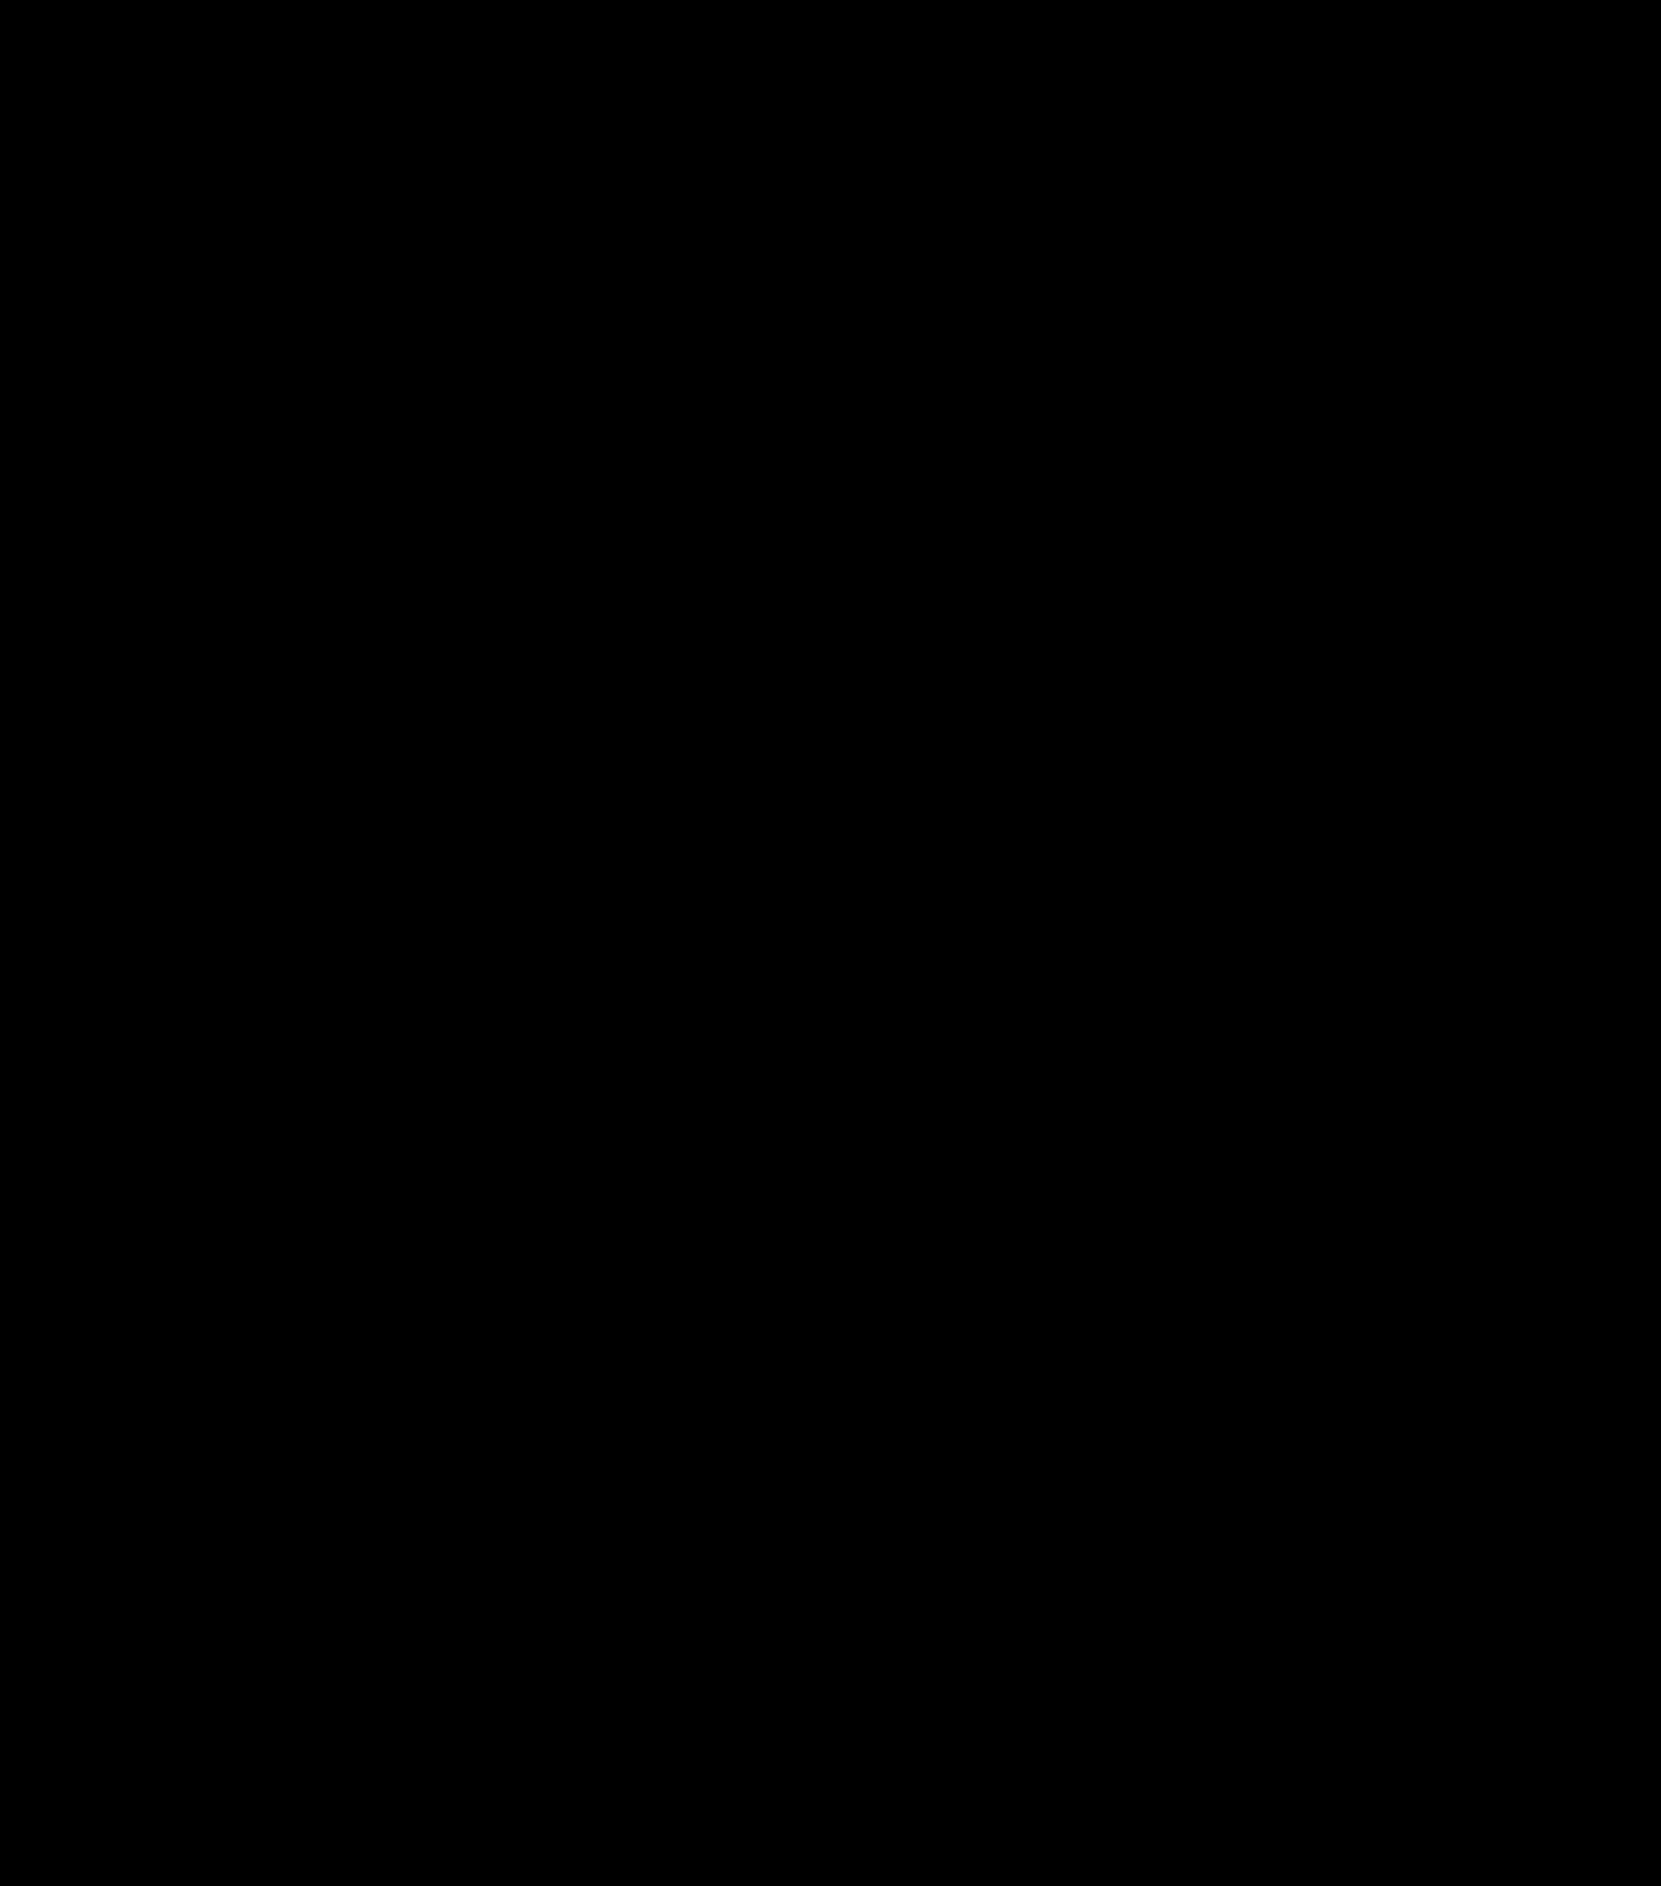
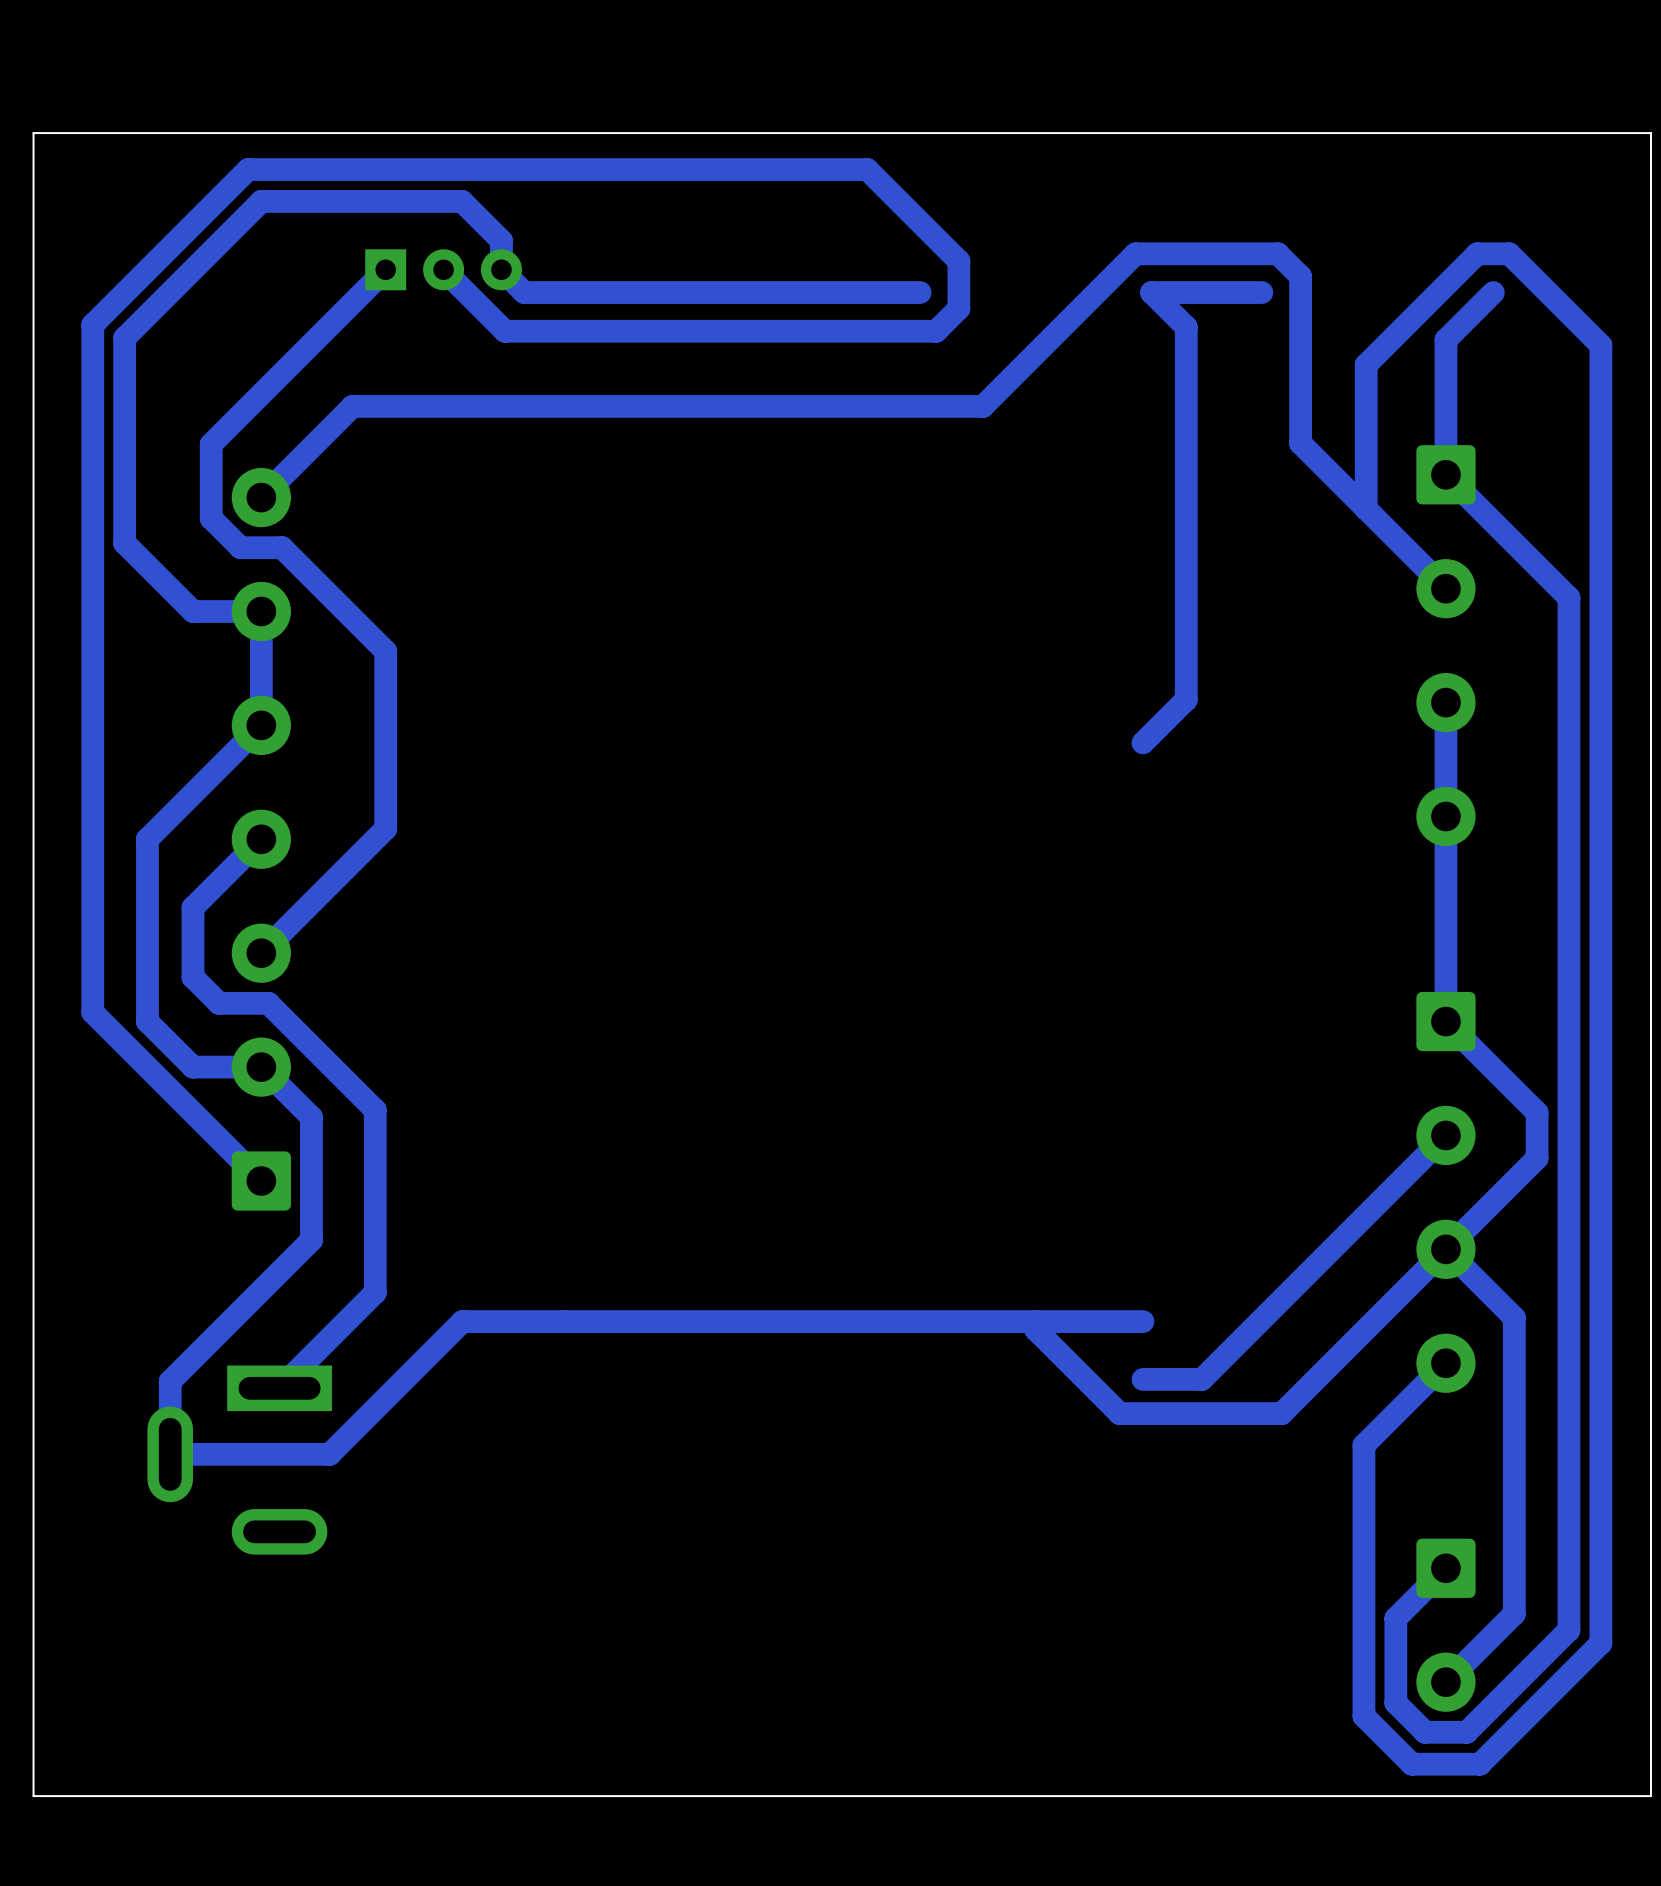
board edge: none -> (1650, 133) (33, 133) (33, 1796) (1650, 1796) (1650, 133)
track: none -> (385, 269) (211, 444) (211, 518) (240, 547) (282, 547) (385, 651) (385, 828) (261, 953)
track: none -> (443, 269) (504, 331) (936, 331) (958, 308) (958, 261) (867, 169) (248, 169) (92, 324) (92, 1012) (261, 1181)
part: none -> (443, 269)
track: none -> (920, 292) (524, 292) (501, 269) (501, 240) (462, 201) (261, 201) (124, 338) (124, 543) (193, 611) (261, 611) (261, 725) (147, 839) (147, 1021) (193, 1067) (261, 1067) (311, 1117) (311, 1240) (170, 1381) (170, 1454) (329, 1454) (462, 1321) (1142, 1321)
track: none -> (1261, 292) (1151, 292) (1186, 327) (1186, 699) (1142, 742)
track: none -> (1493, 292) (1445, 339) (1445, 474) (1568, 597) (1568, 1630) (1466, 1732) (1425, 1732) (1395, 1702) (1395, 1618) (1445, 1568)
track: none -> (261, 497) (352, 406) (982, 406) (1135, 253) (1277, 253) (1300, 276) (1300, 443) (1445, 588)
track: none -> (1366, 508) (1366, 364) (1477, 253) (1509, 253) (1600, 345) (1600, 1643) (1479, 1764) (1411, 1764) (1363, 1716) (1363, 1445) (1445, 1363)
part: none -> (1445, 645)
track: none -> (1445, 702) (1445, 1021) (1537, 1112) (1537, 1158) (1281, 1413) (1119, 1413) (1035, 1329) (1035, 1321)
track: none -> (261, 839) (193, 907) (193, 977) (219, 1003) (268, 1003) (375, 1110) (375, 1292) (279, 1388)
part: none -> (261, 839)
track: none -> (1445, 1135) (1201, 1379) (1142, 1379)
part: none -> (1445, 1192)
track: none -> (1445, 1249) (1514, 1317) (1514, 1613) (1445, 1682)
part: none -> (239, 1460)
part: none -> (1445, 1625)

